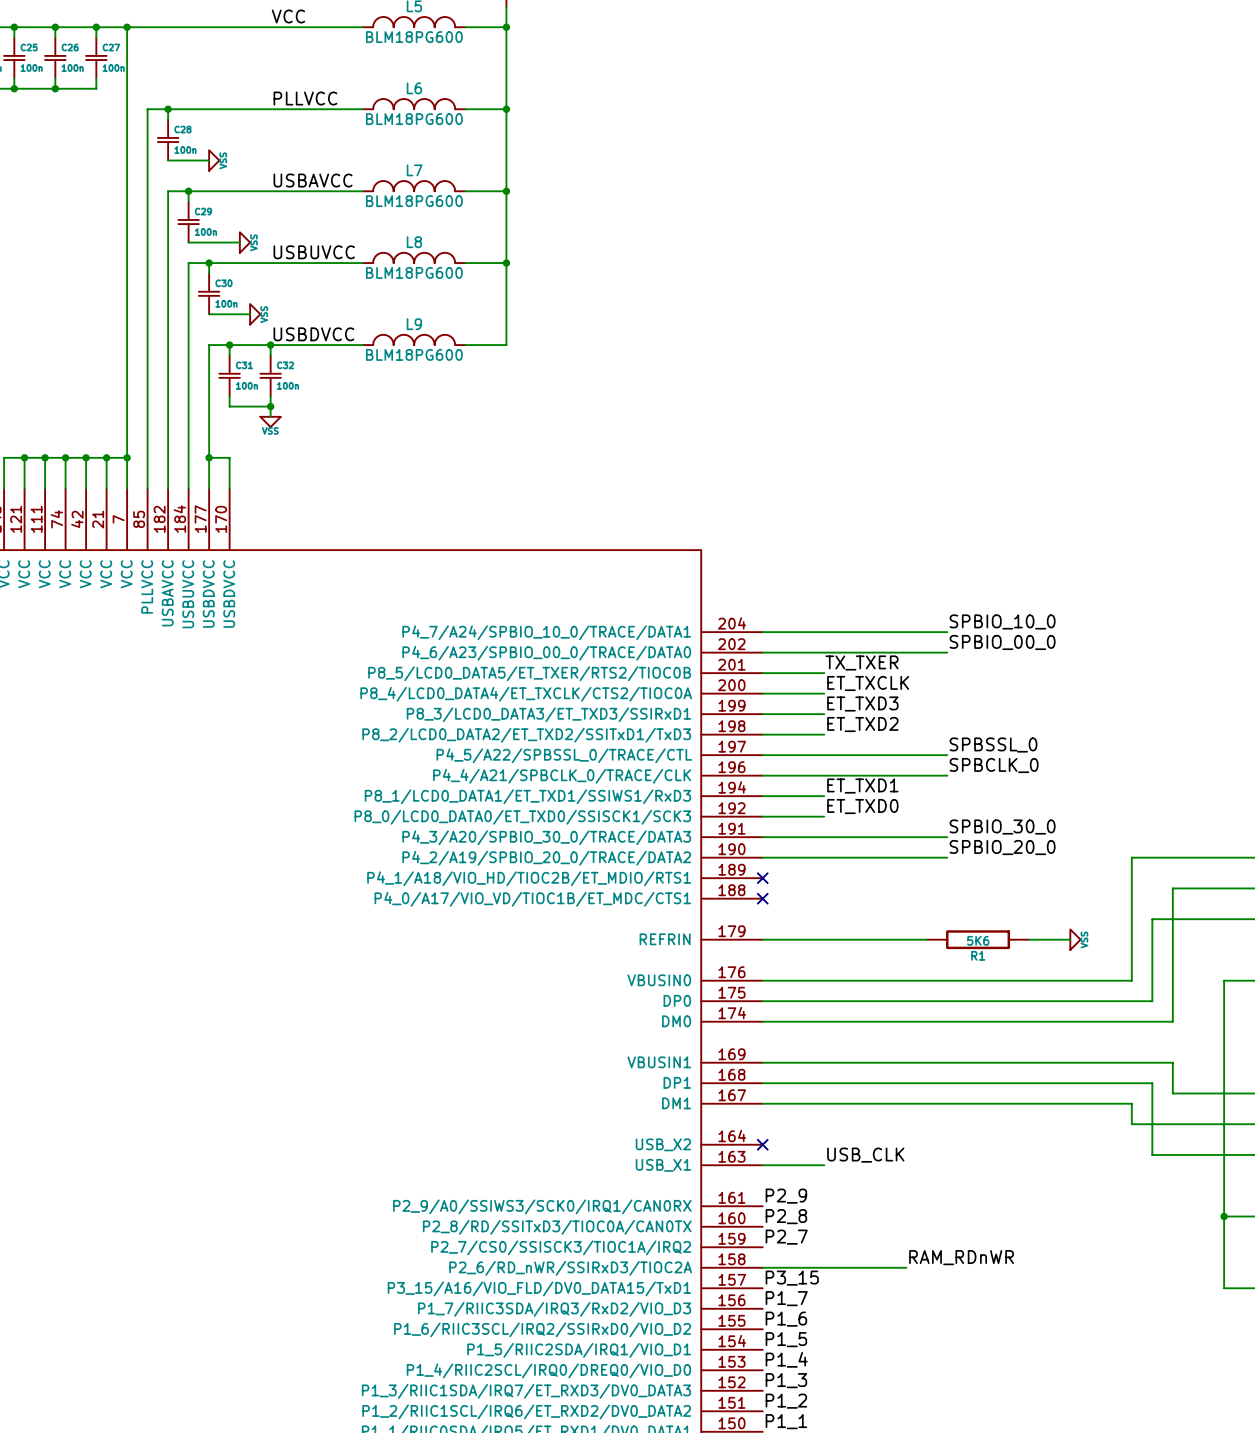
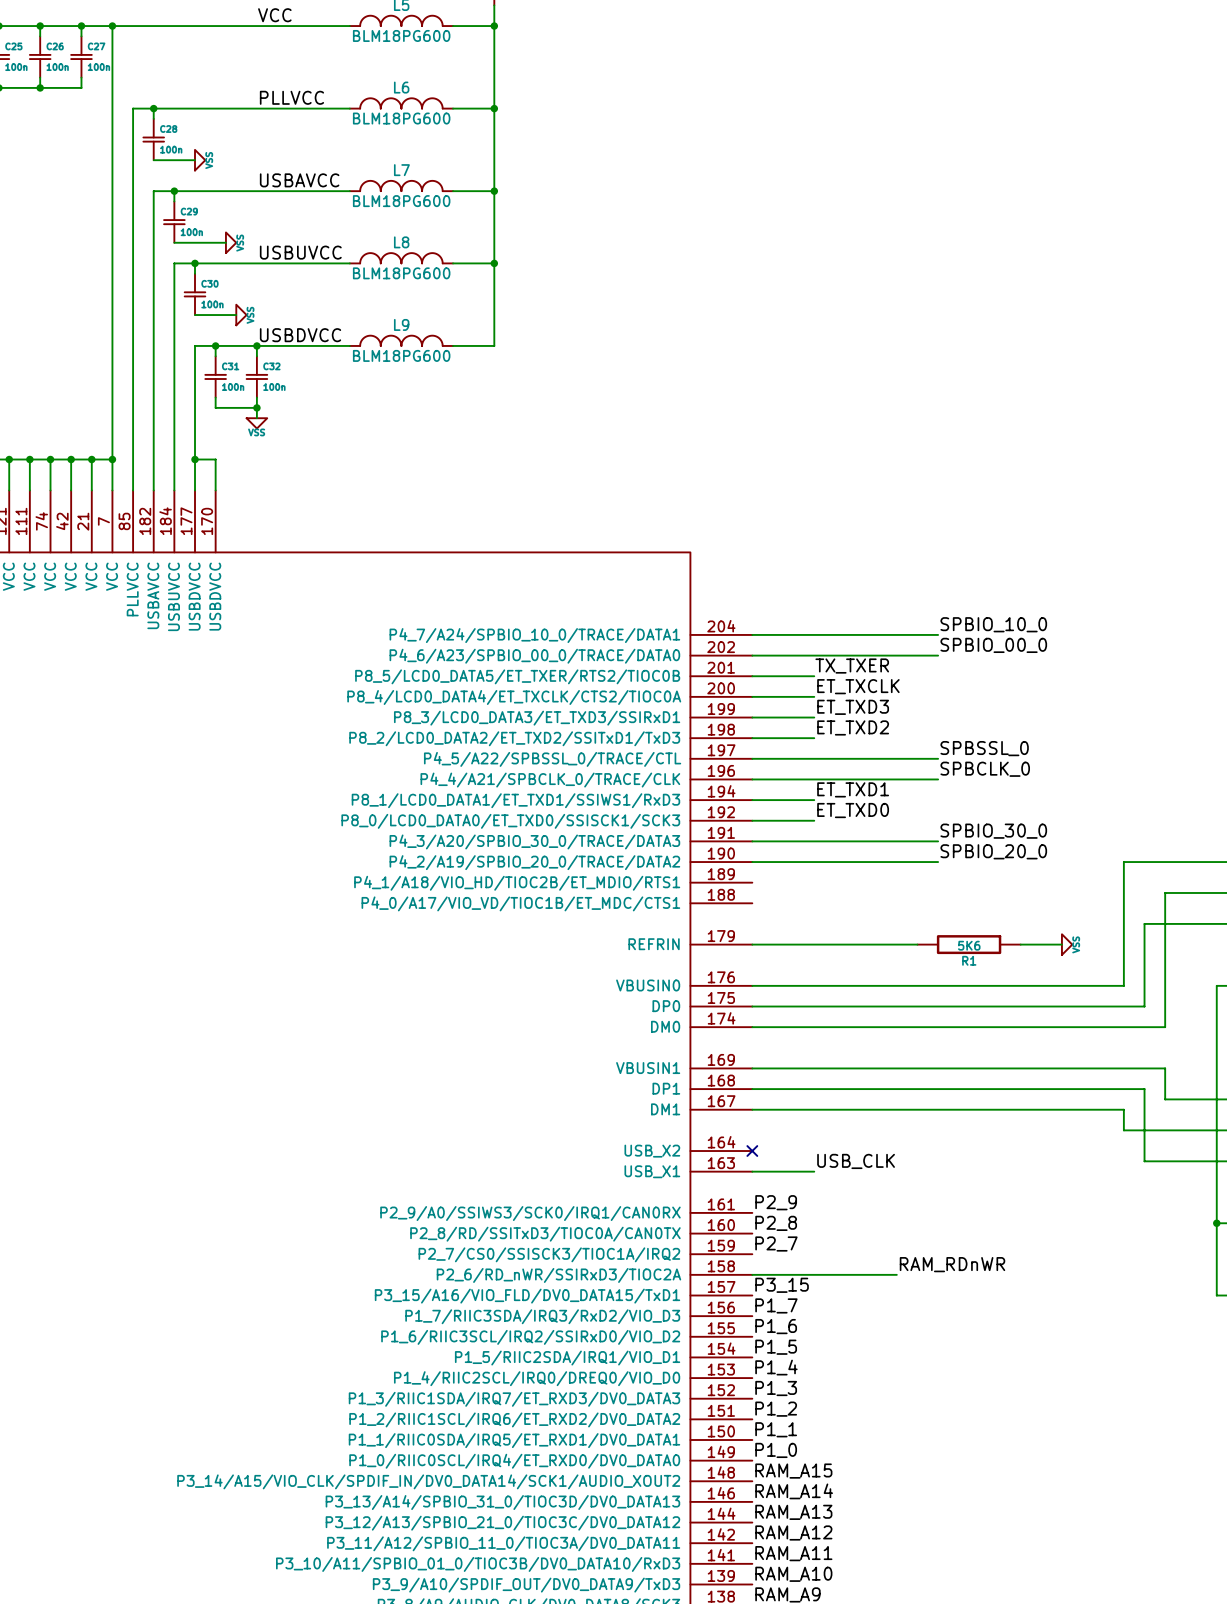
no-connect mark: (762, 878) -> none
no-connect mark: (762, 898) -> none

